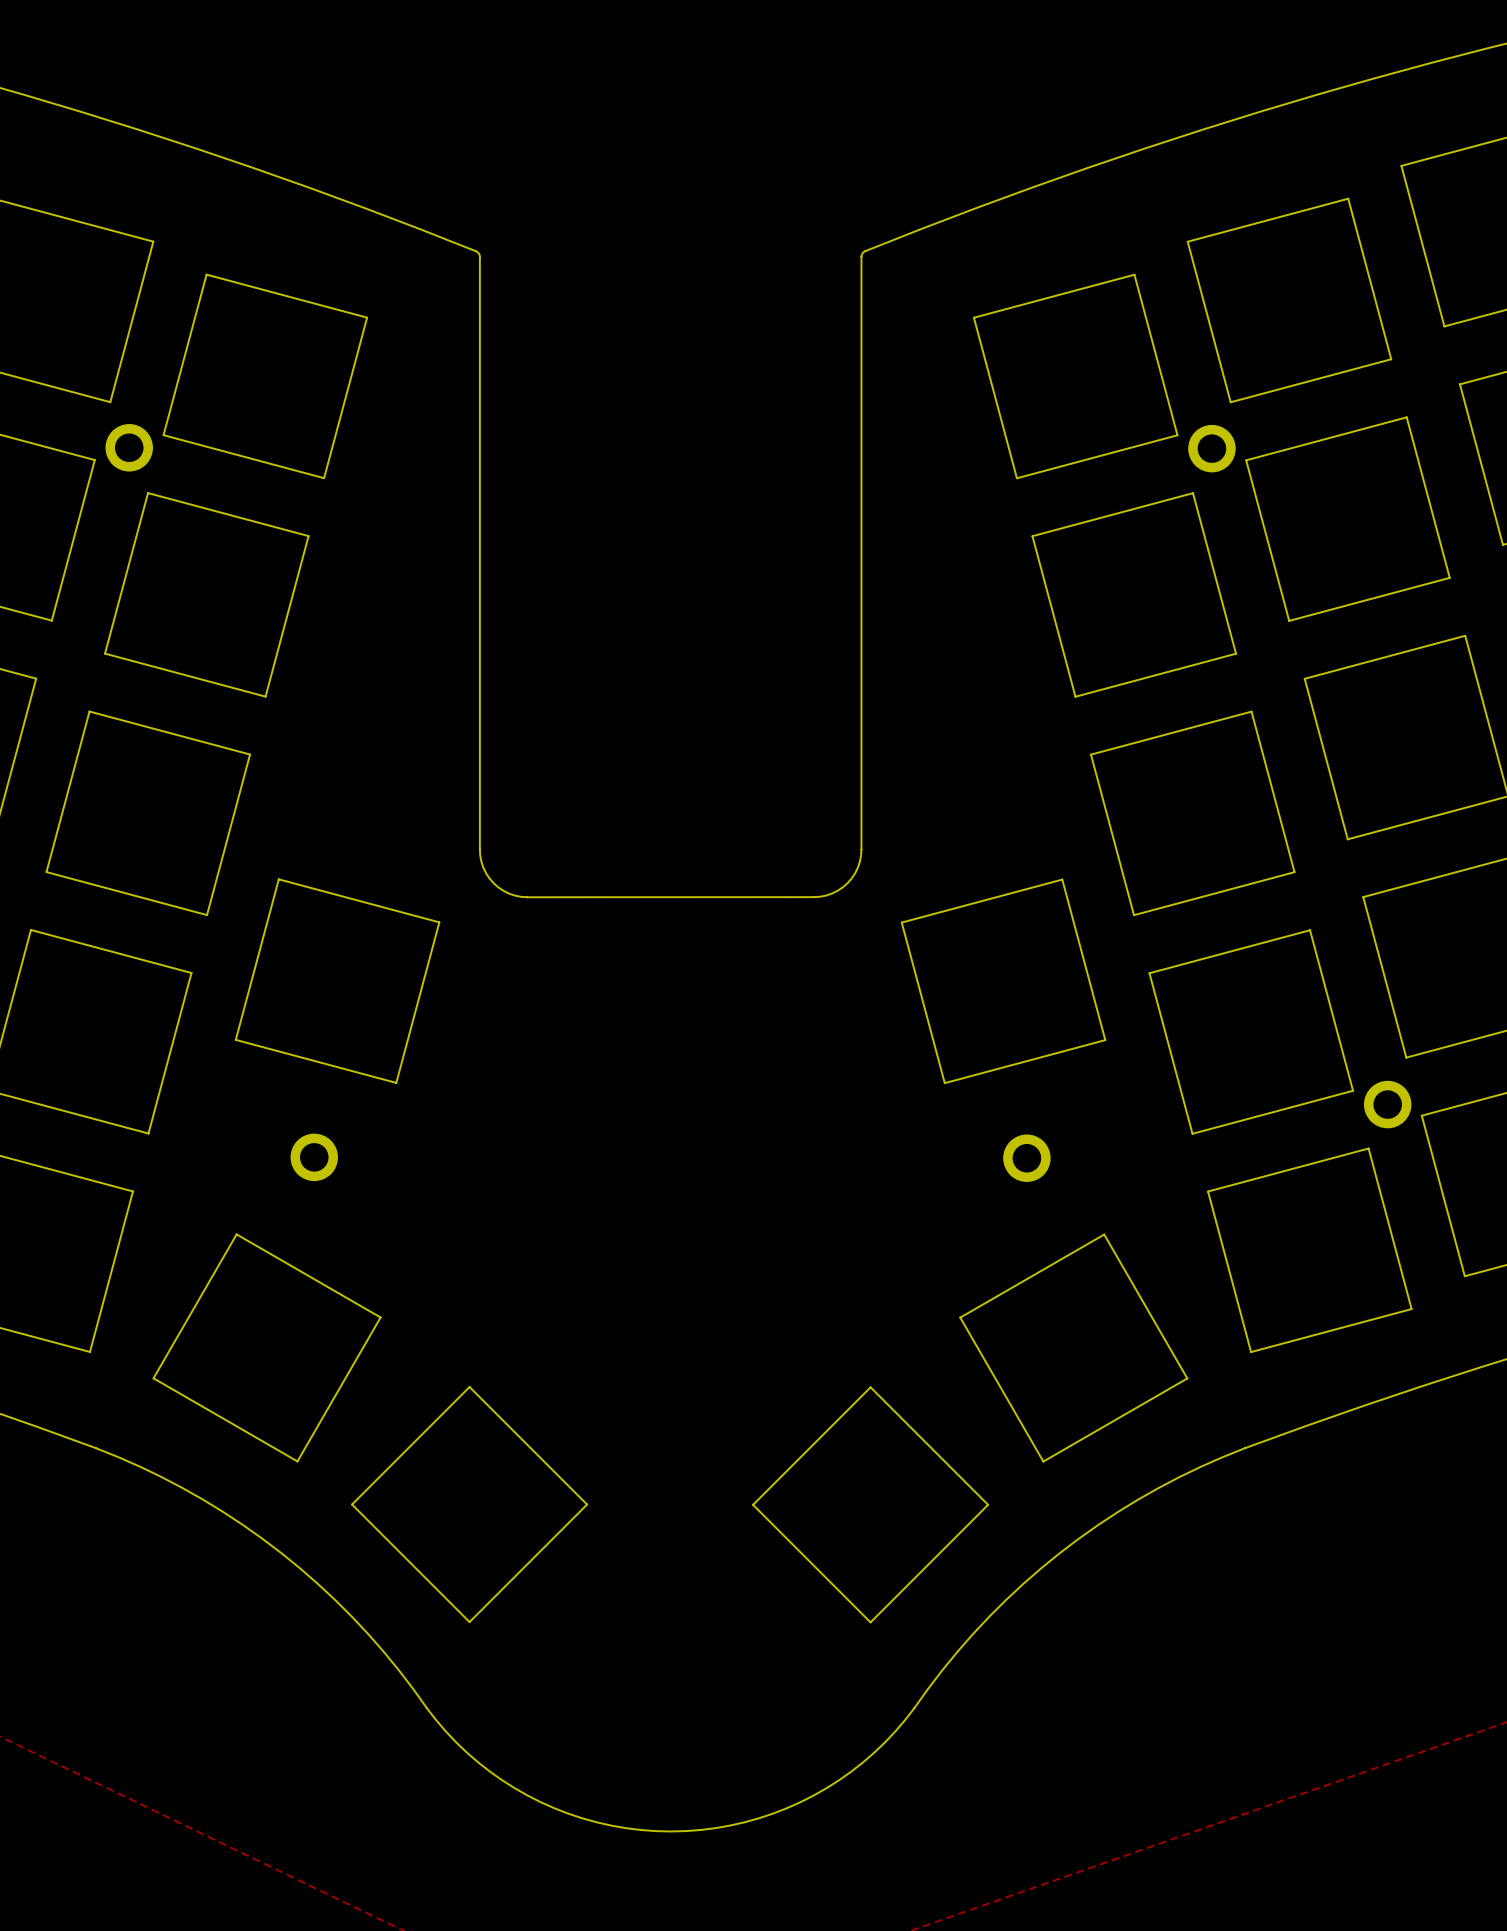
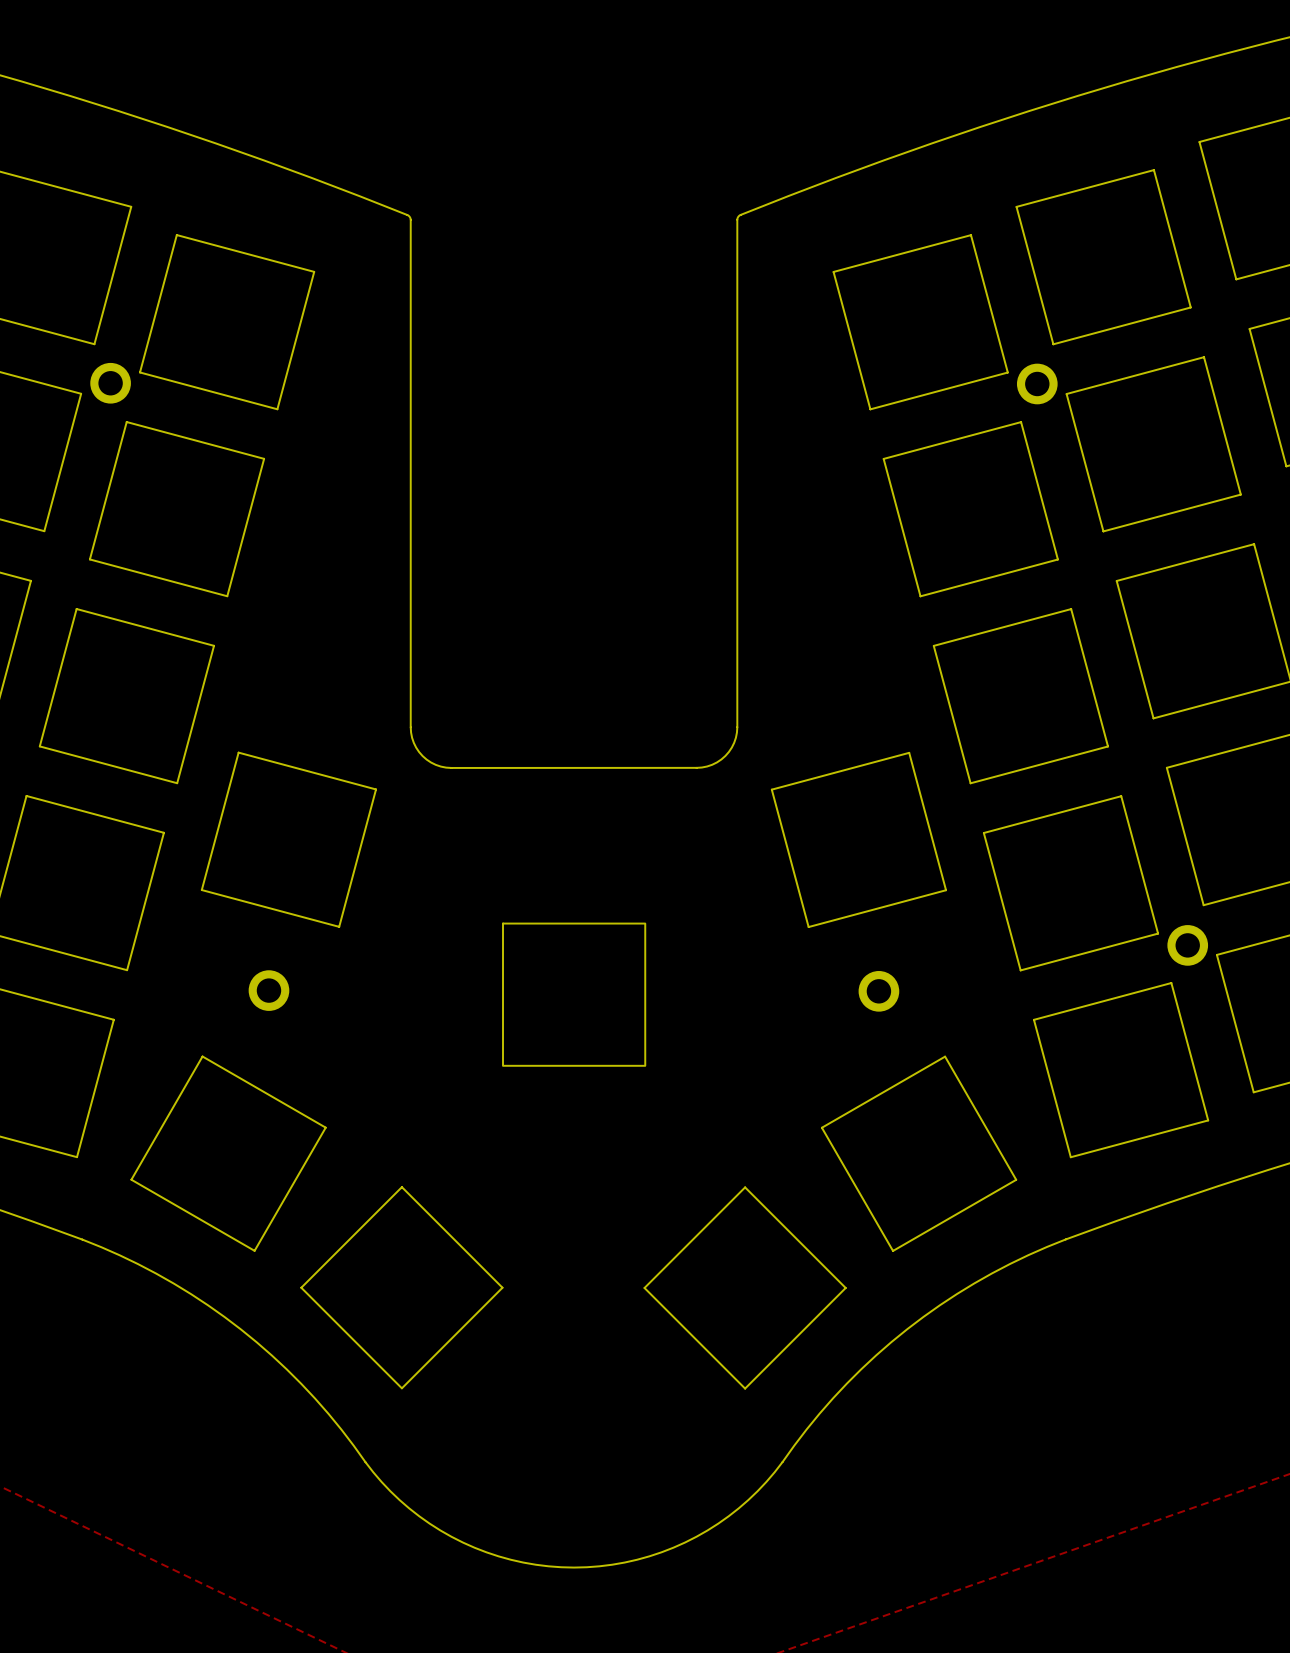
drawing: none -> [502, 922, 647, 1067]

